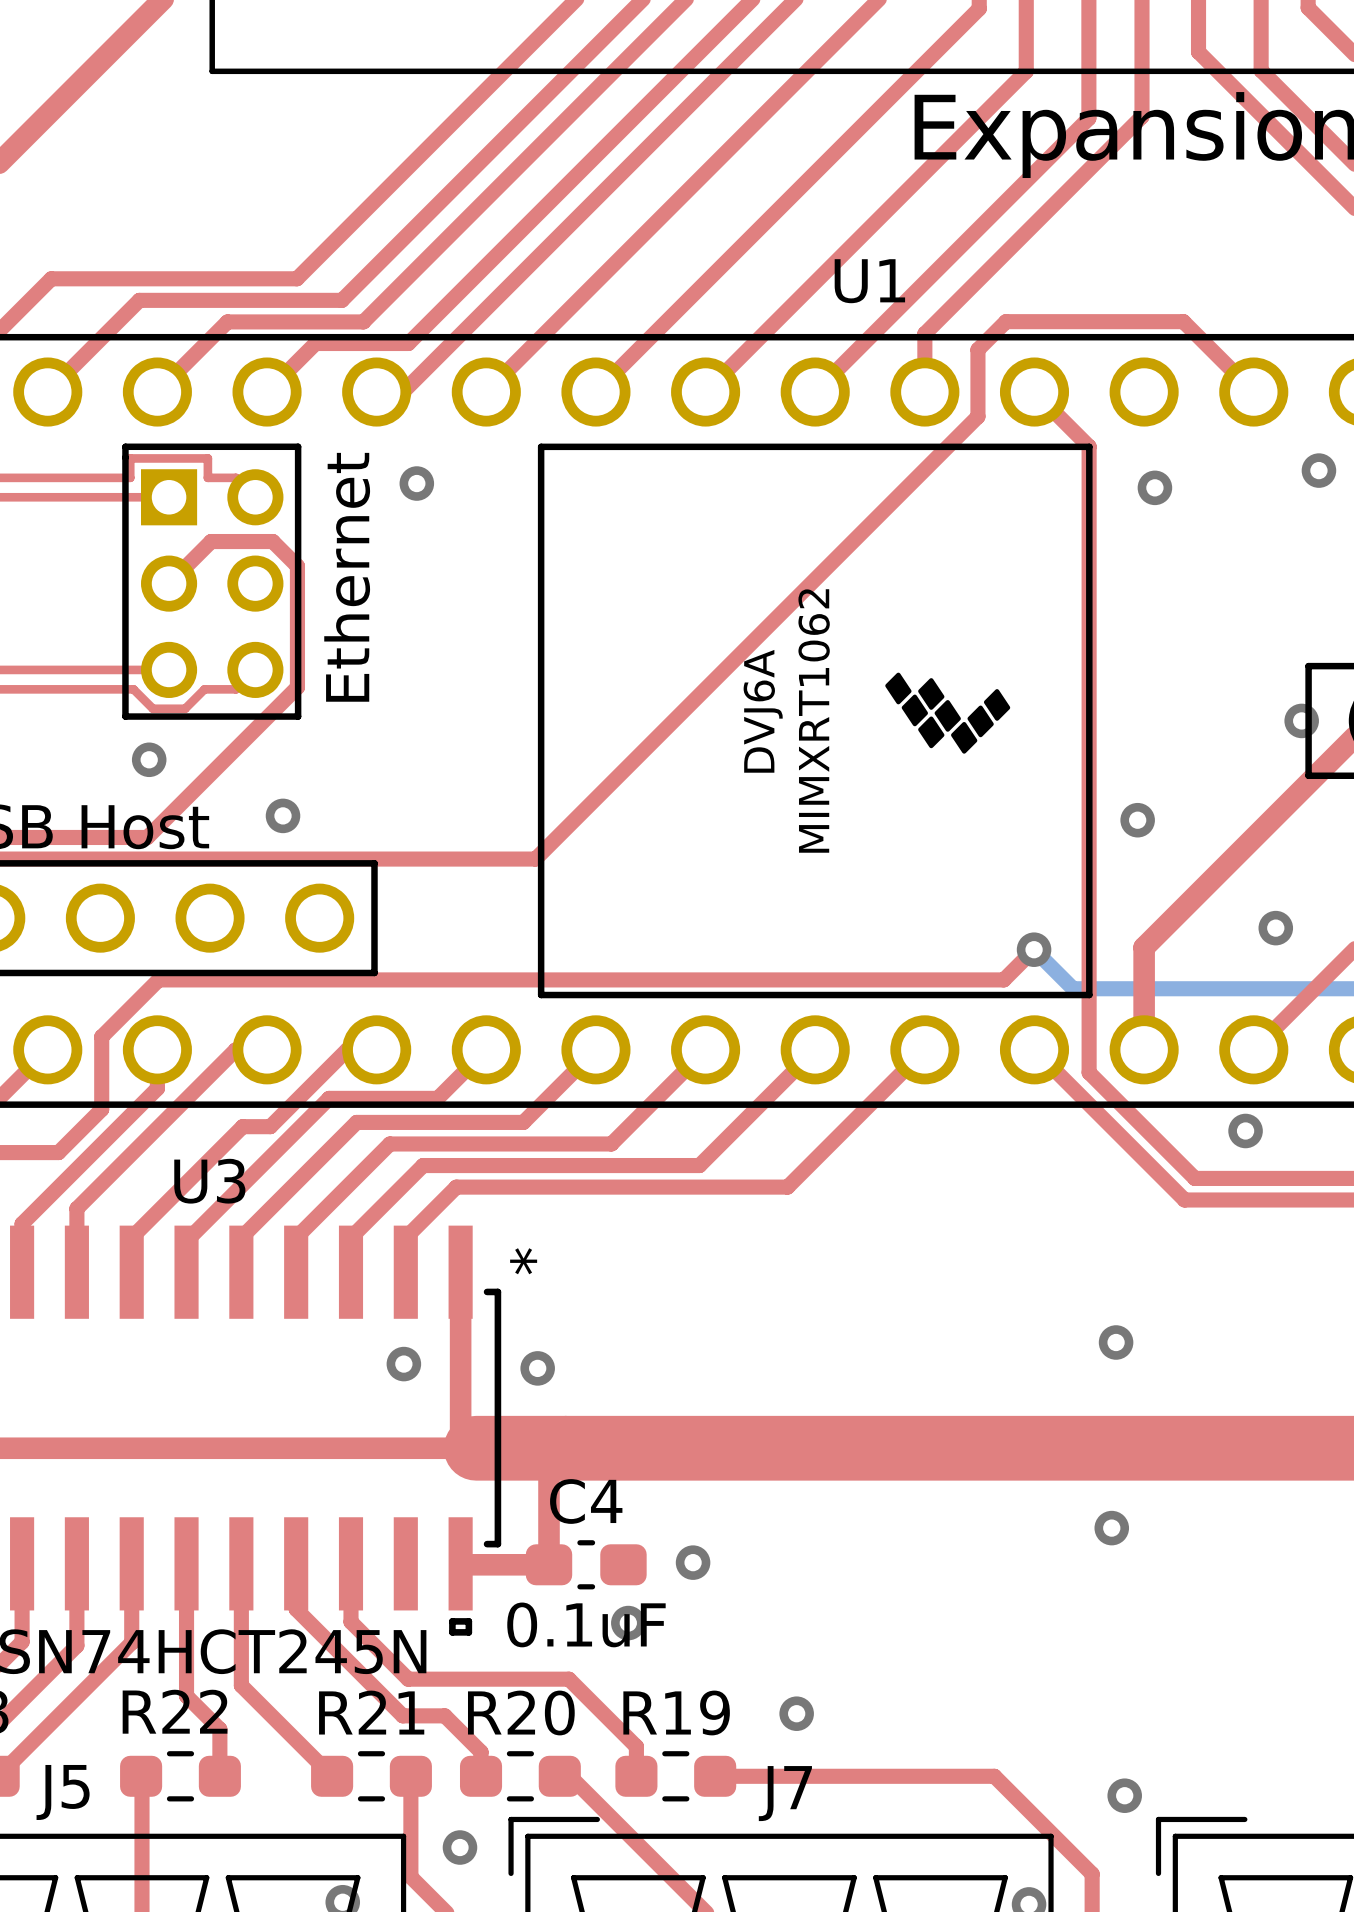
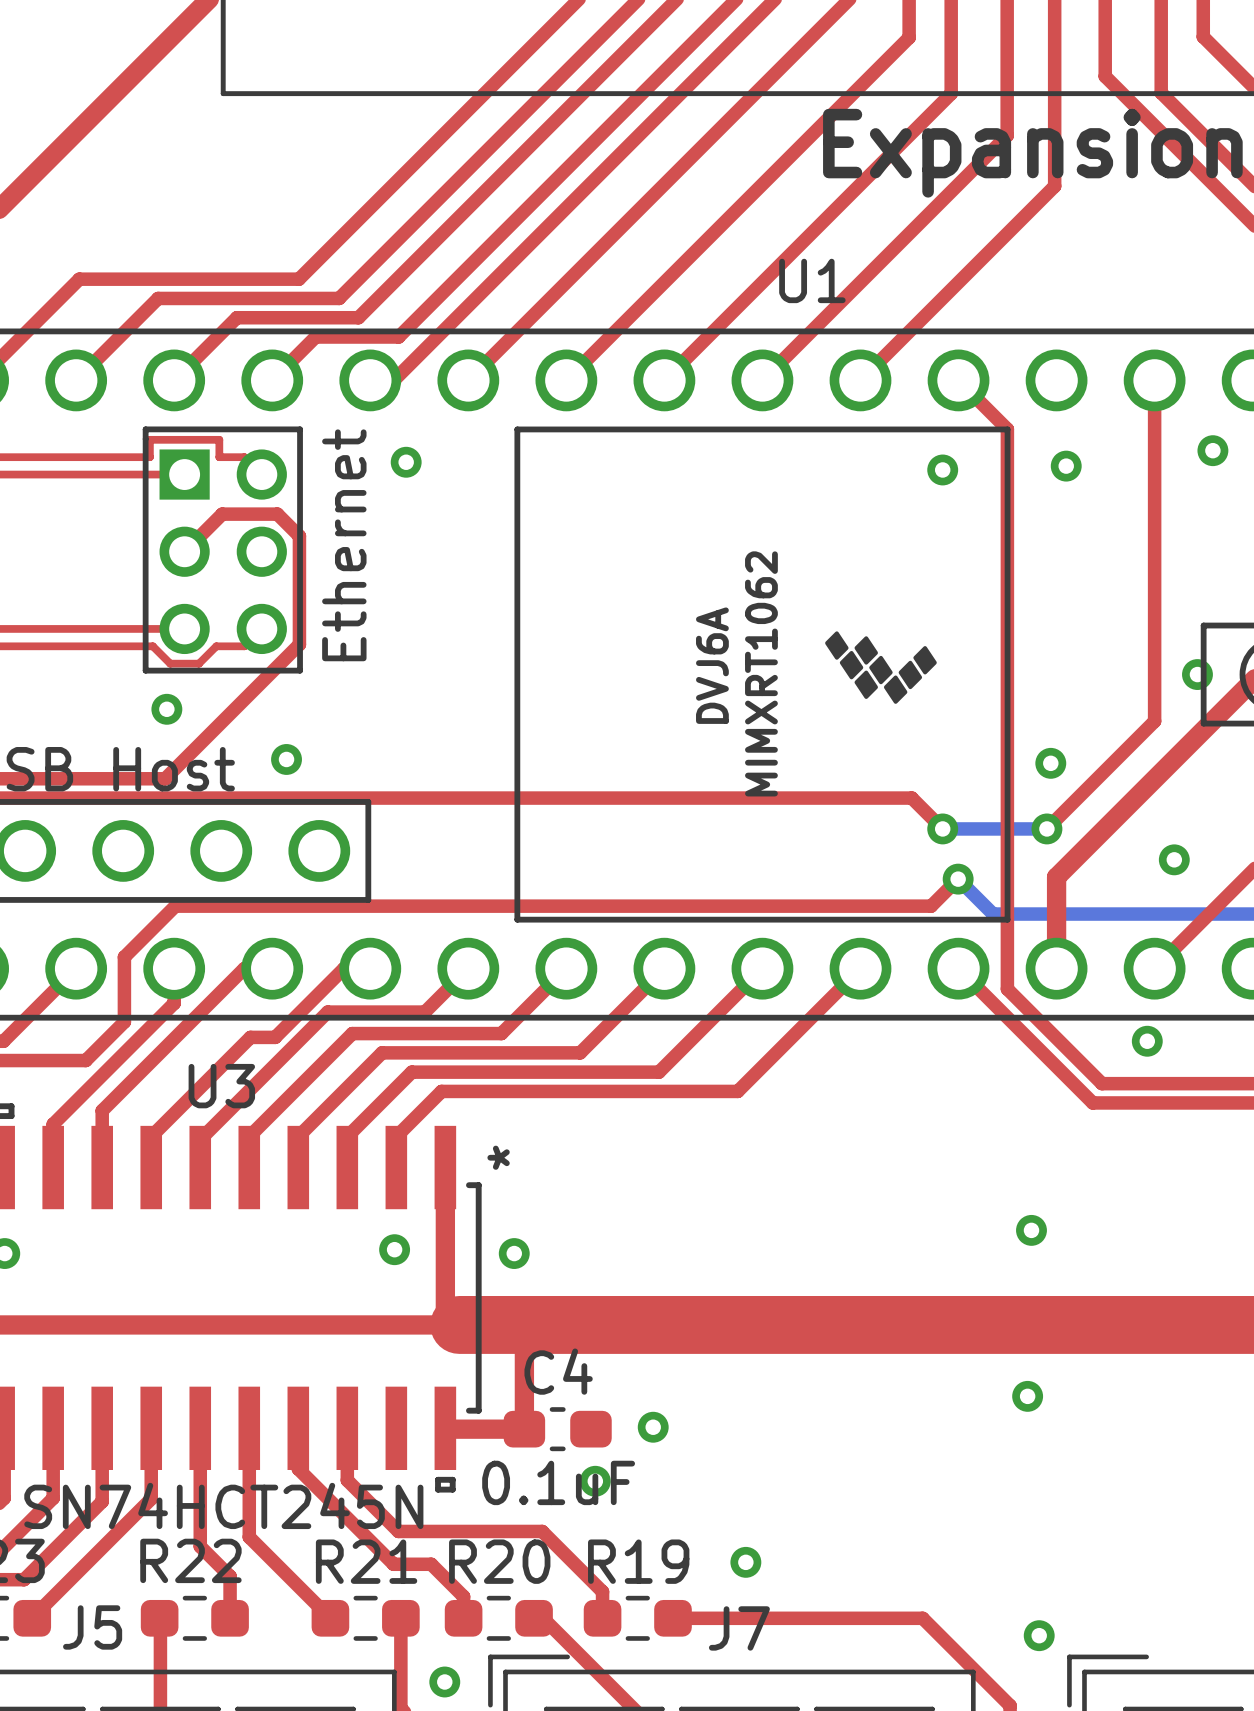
top track: (1141, 116) (924, 333) (924, 392) -> (1054, 134) (1054, 186) (860, 380)
top track: (1253, 392) (1183, 321) (1006, 321) (977, 349) (977, 416) (535, 859) -> (942, 828) (911, 798) (512, 798)
top track: none -> (1154, 380) (1154, 721) (1046, 828)
via: none -> (942, 469)
bottom track: none -> (942, 828) (1046, 828)
via: none -> (942, 828)
via: none -> (1046, 828)

